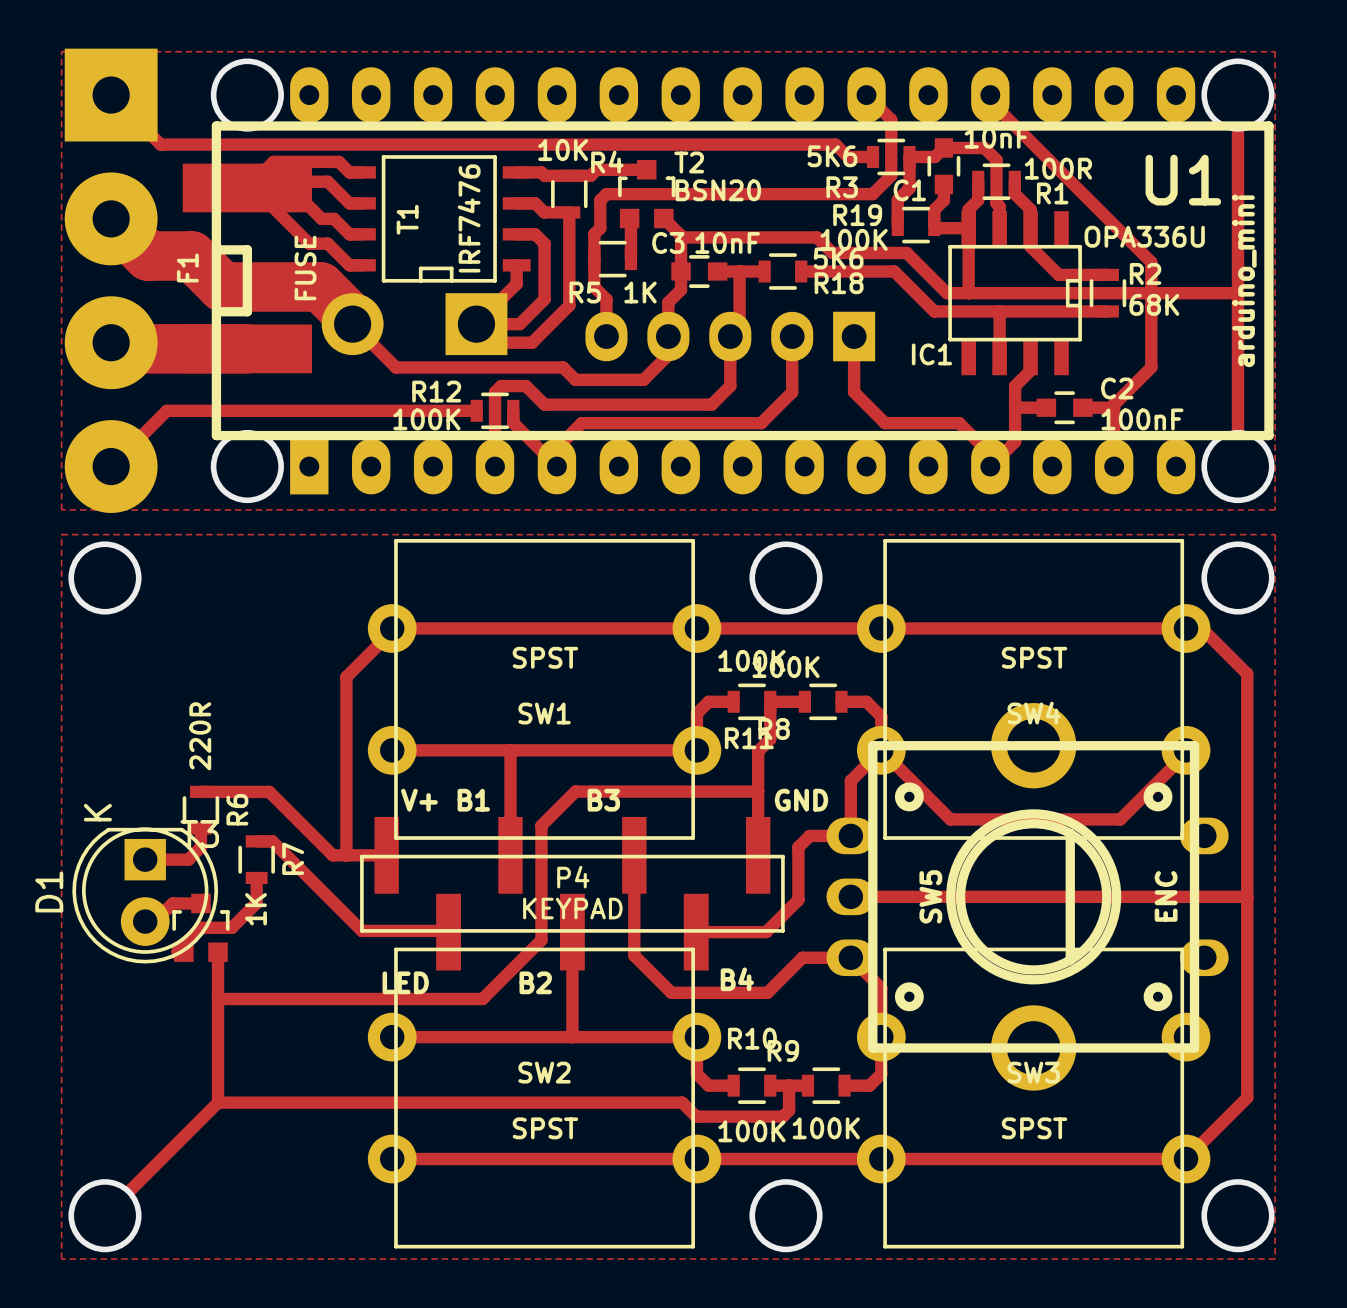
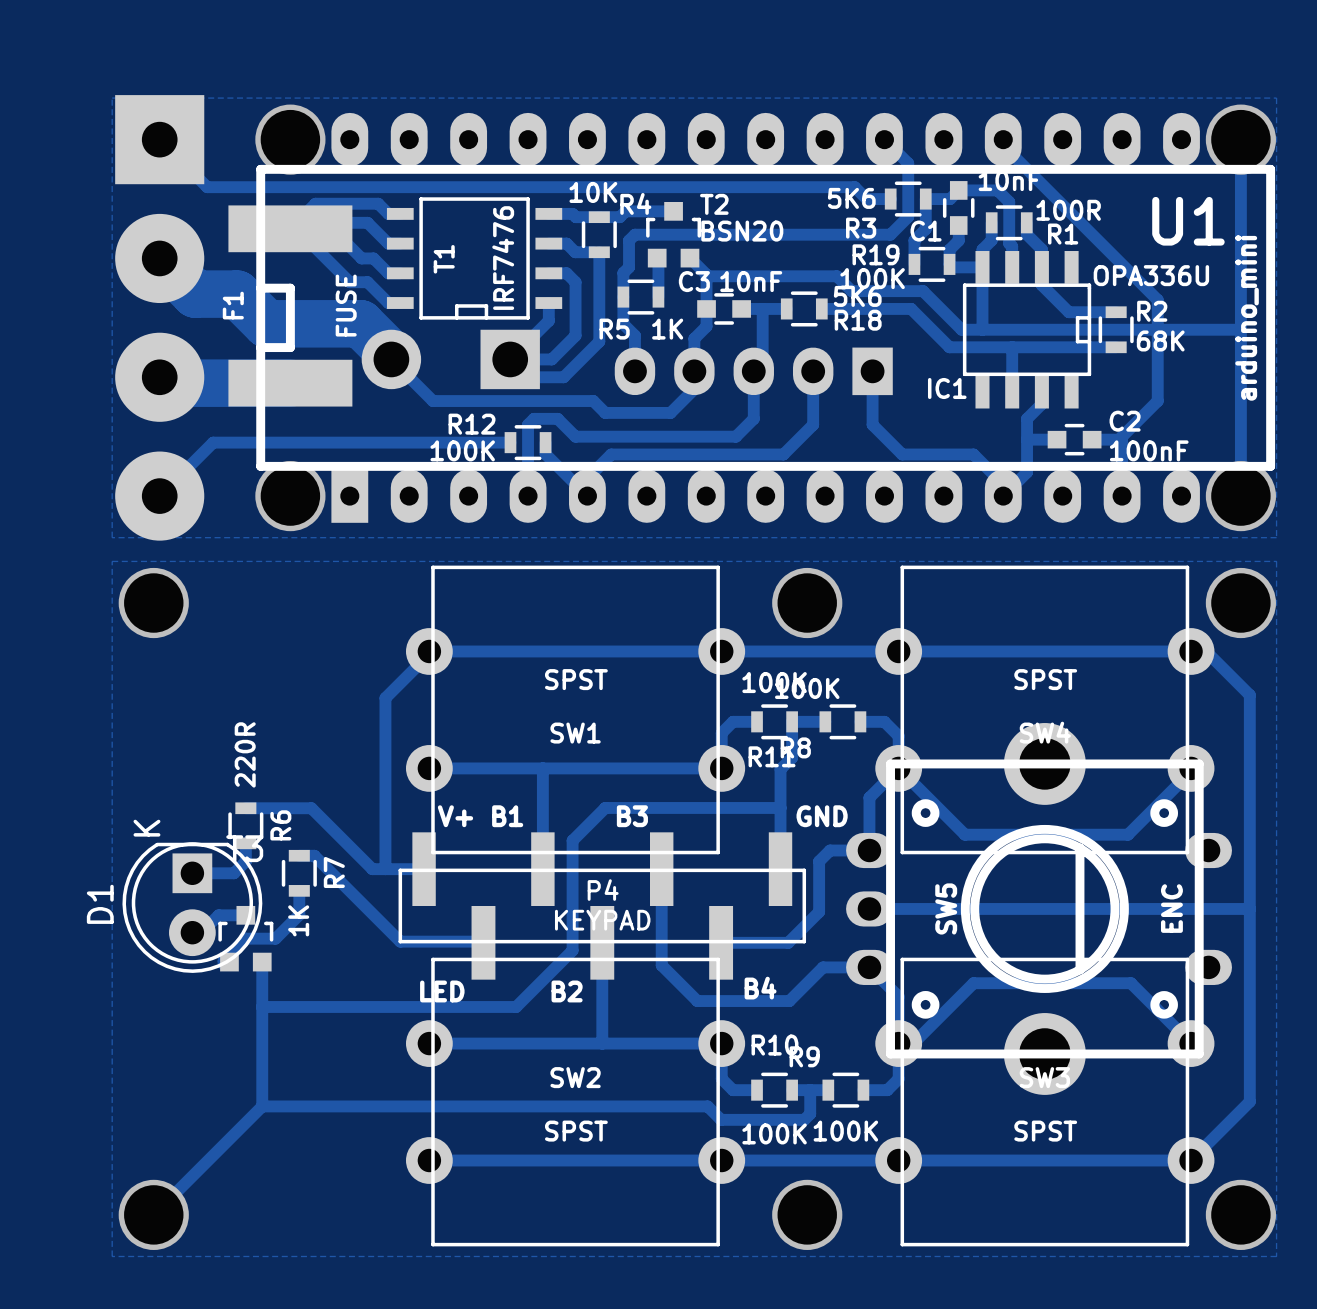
track: none -> (1191, 1043) (1131, 983) (973, 983) (904, 1052)

